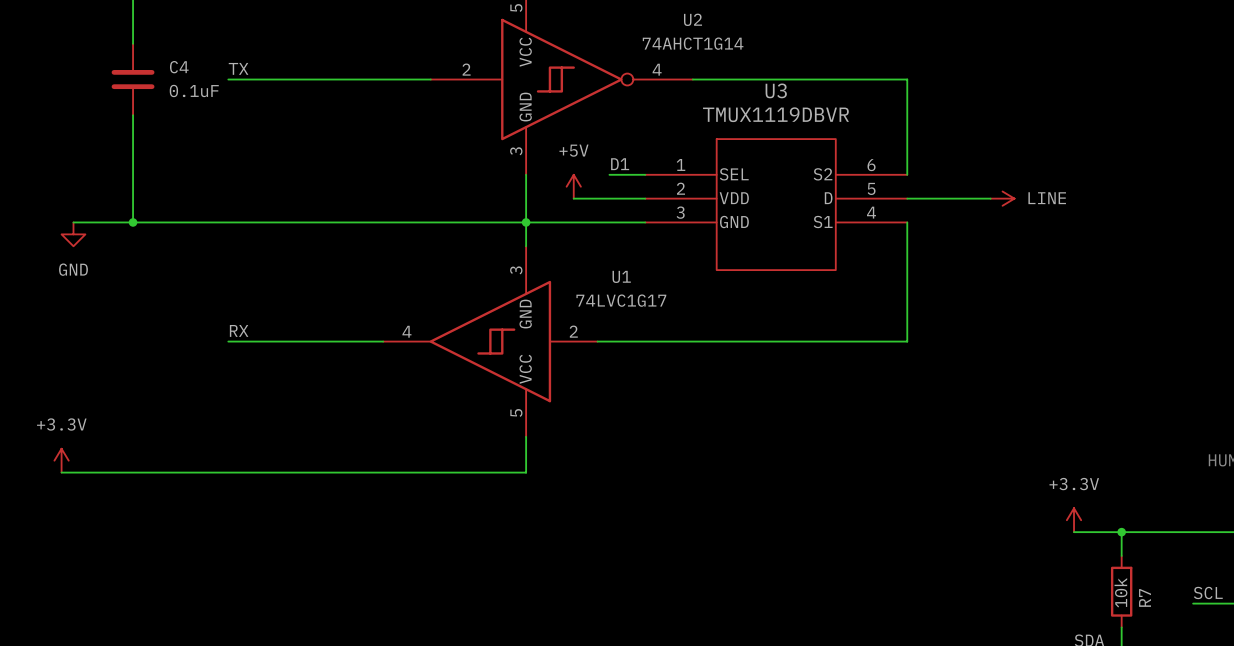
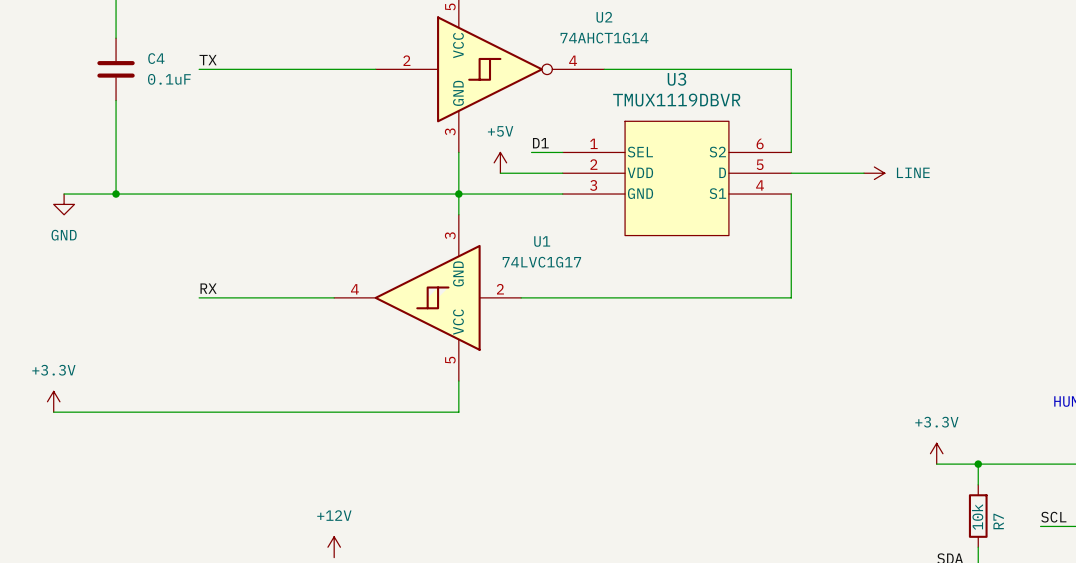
power symbol: none -> +12V (334, 547)

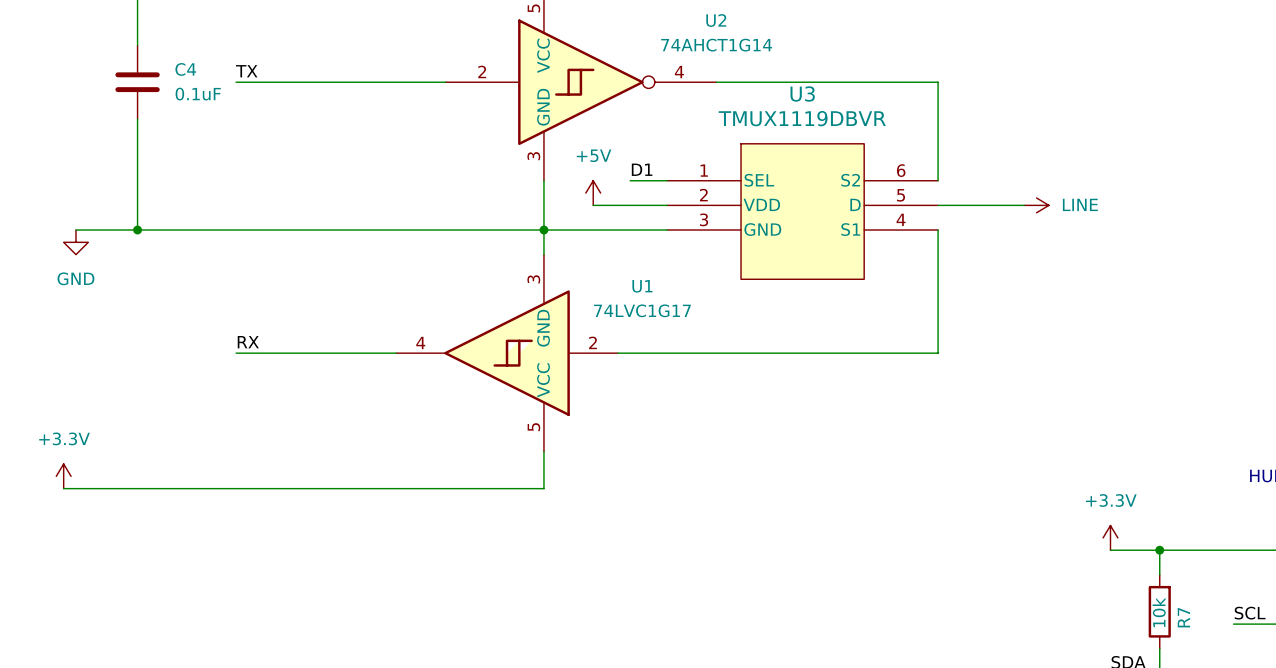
power symbol: +12V (334, 547) -> none

